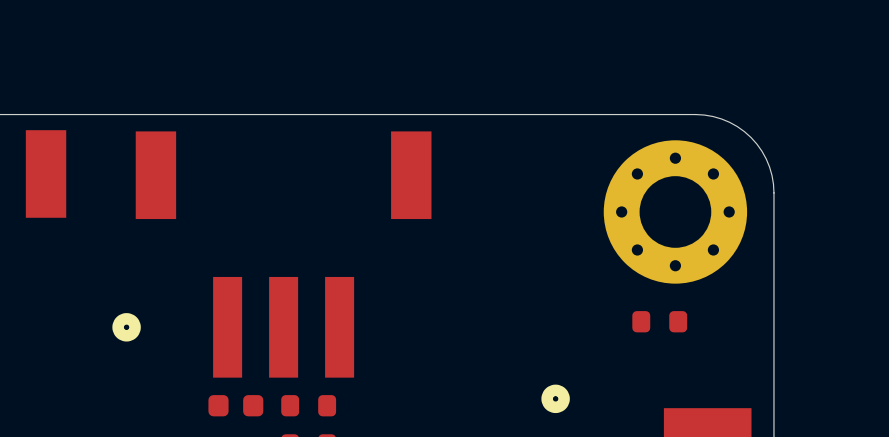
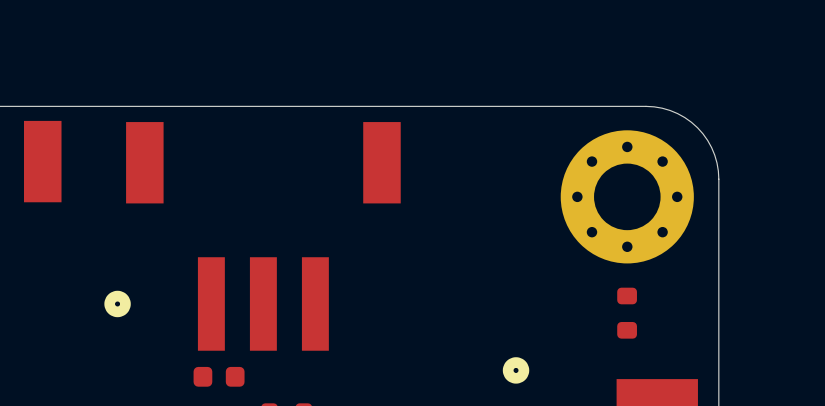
part rotation: 0° (659, 321) -> 90° clockwise (627, 313)
part: (308, 405) -> none

